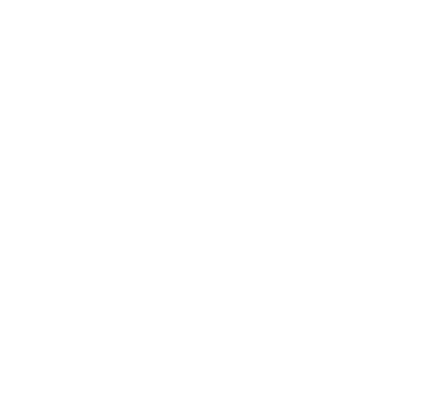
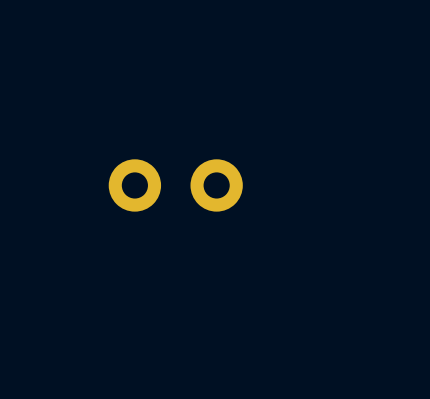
part: none -> (175, 185)

